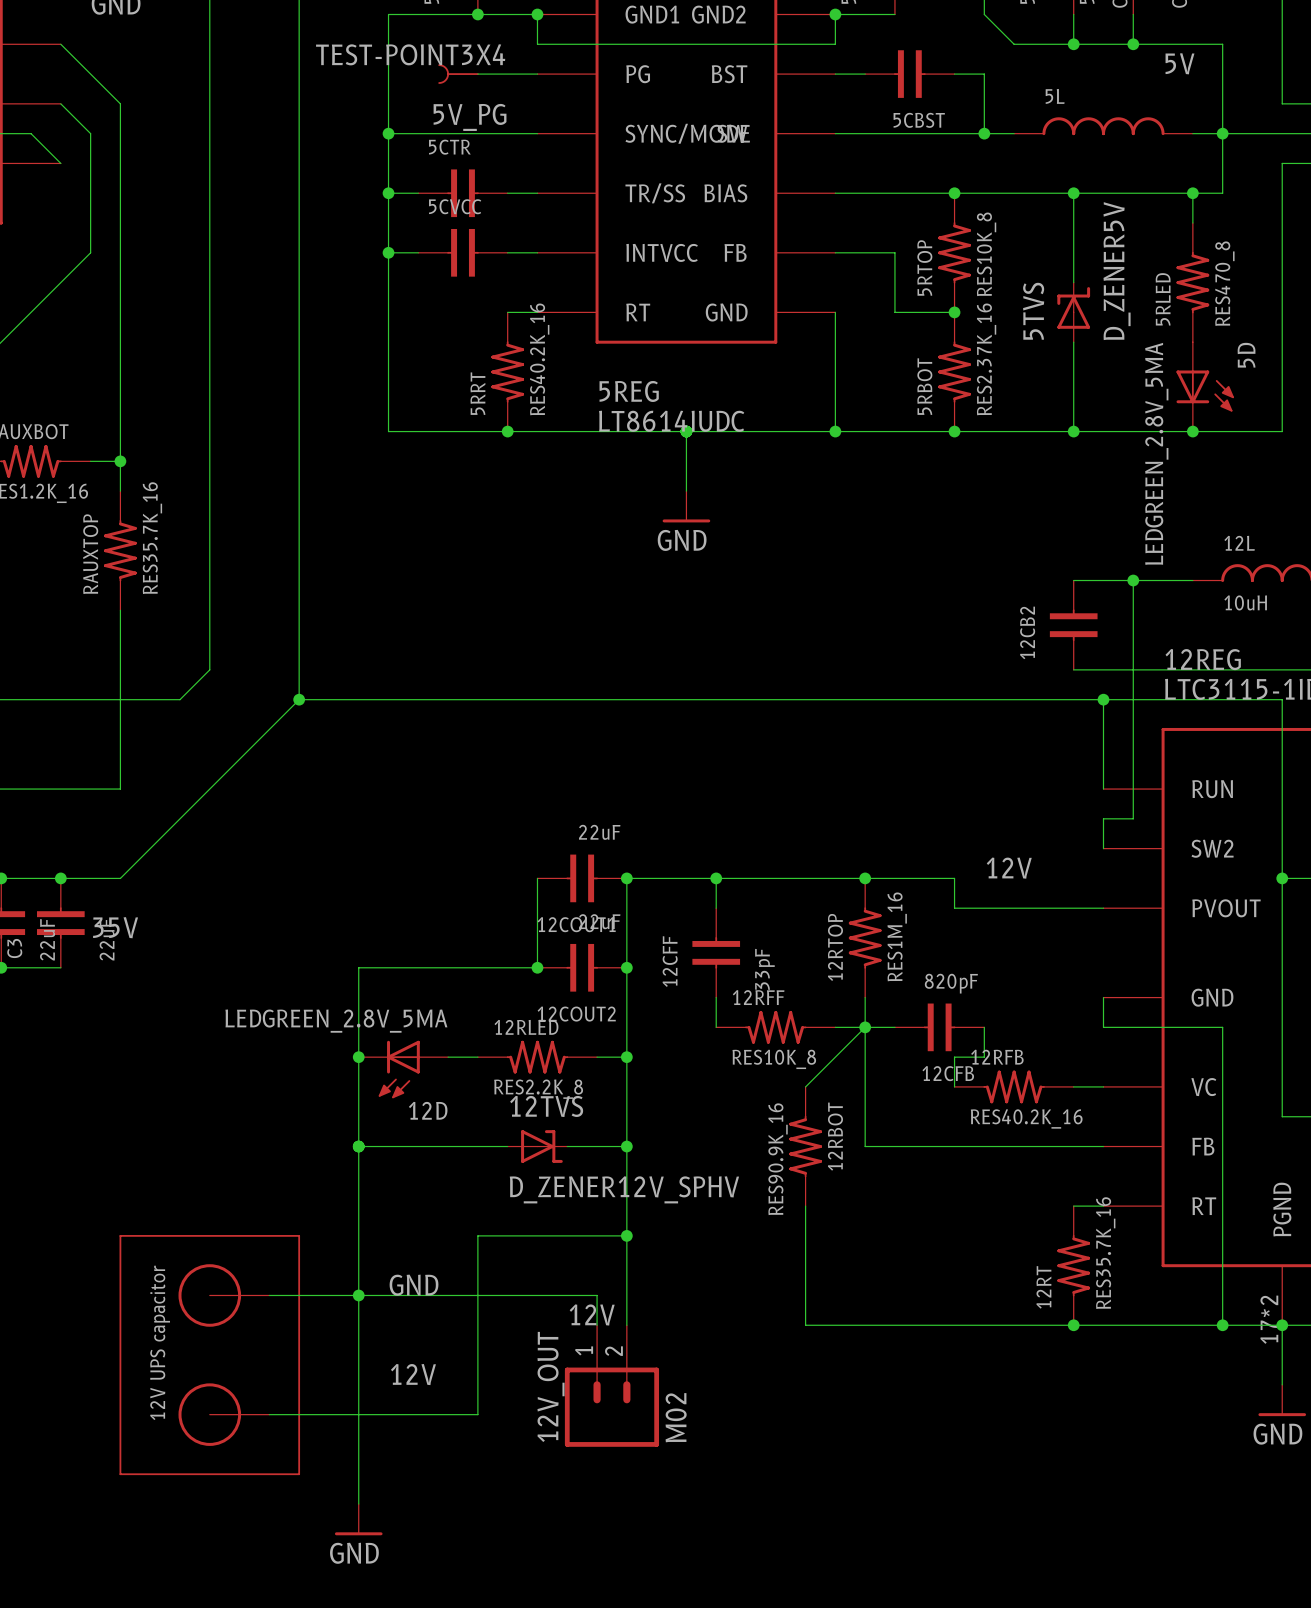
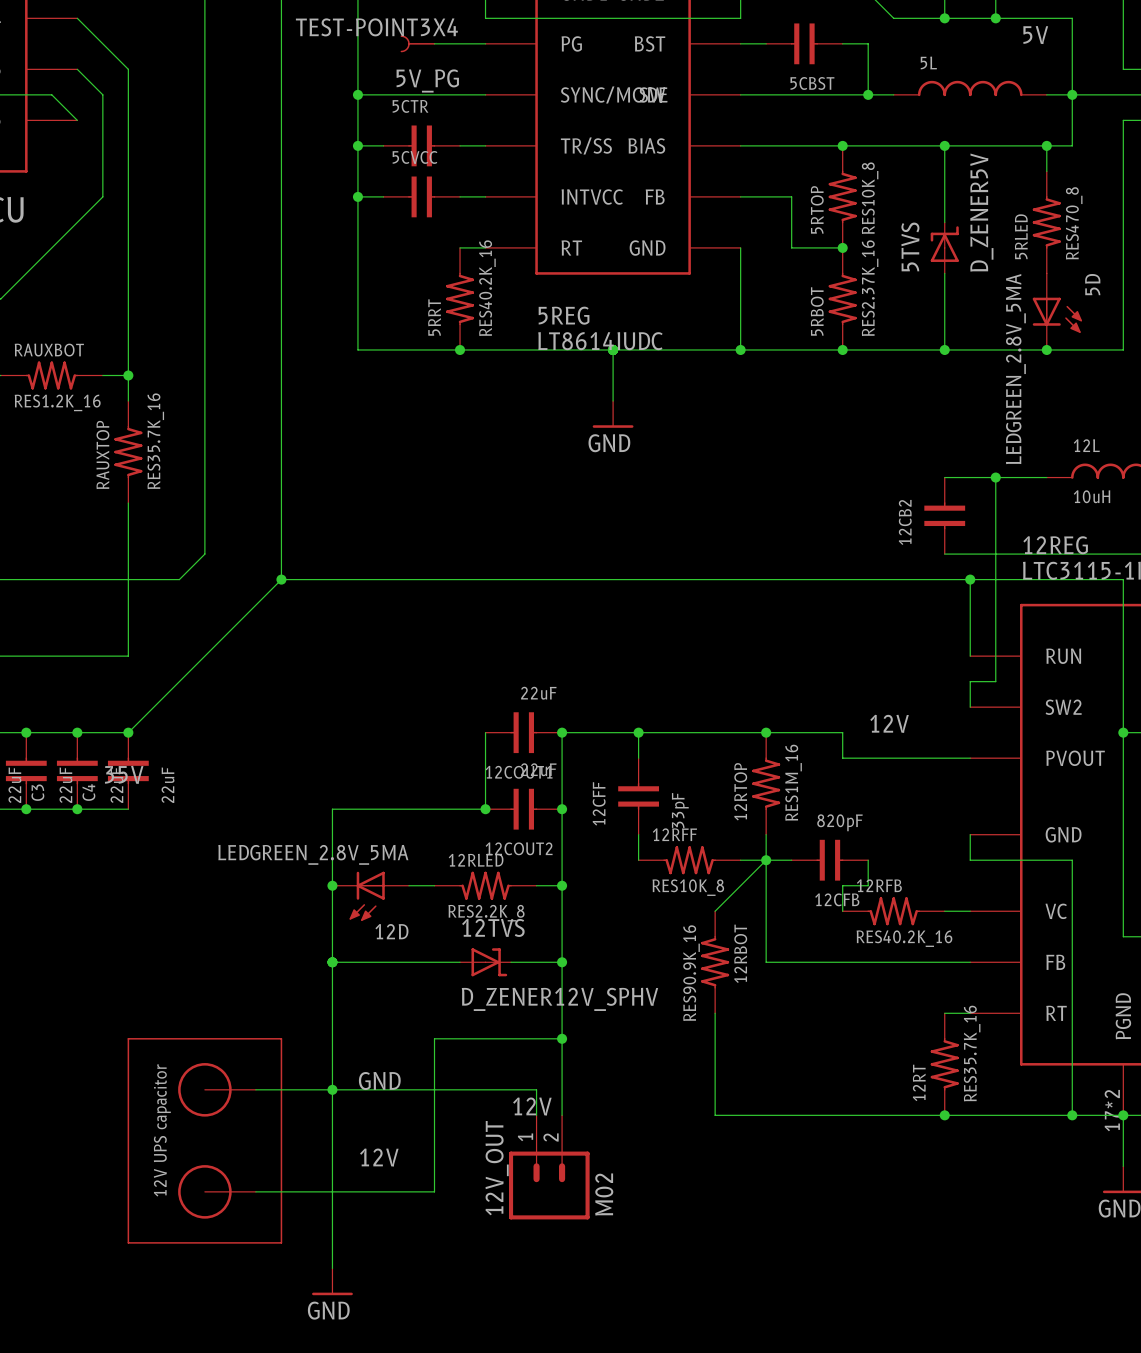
junction: none -> (128, 732)
C4: none -> 22uF (128, 770)
wire: none -> (77, 809) (128, 809)
junction: none -> (77, 809)

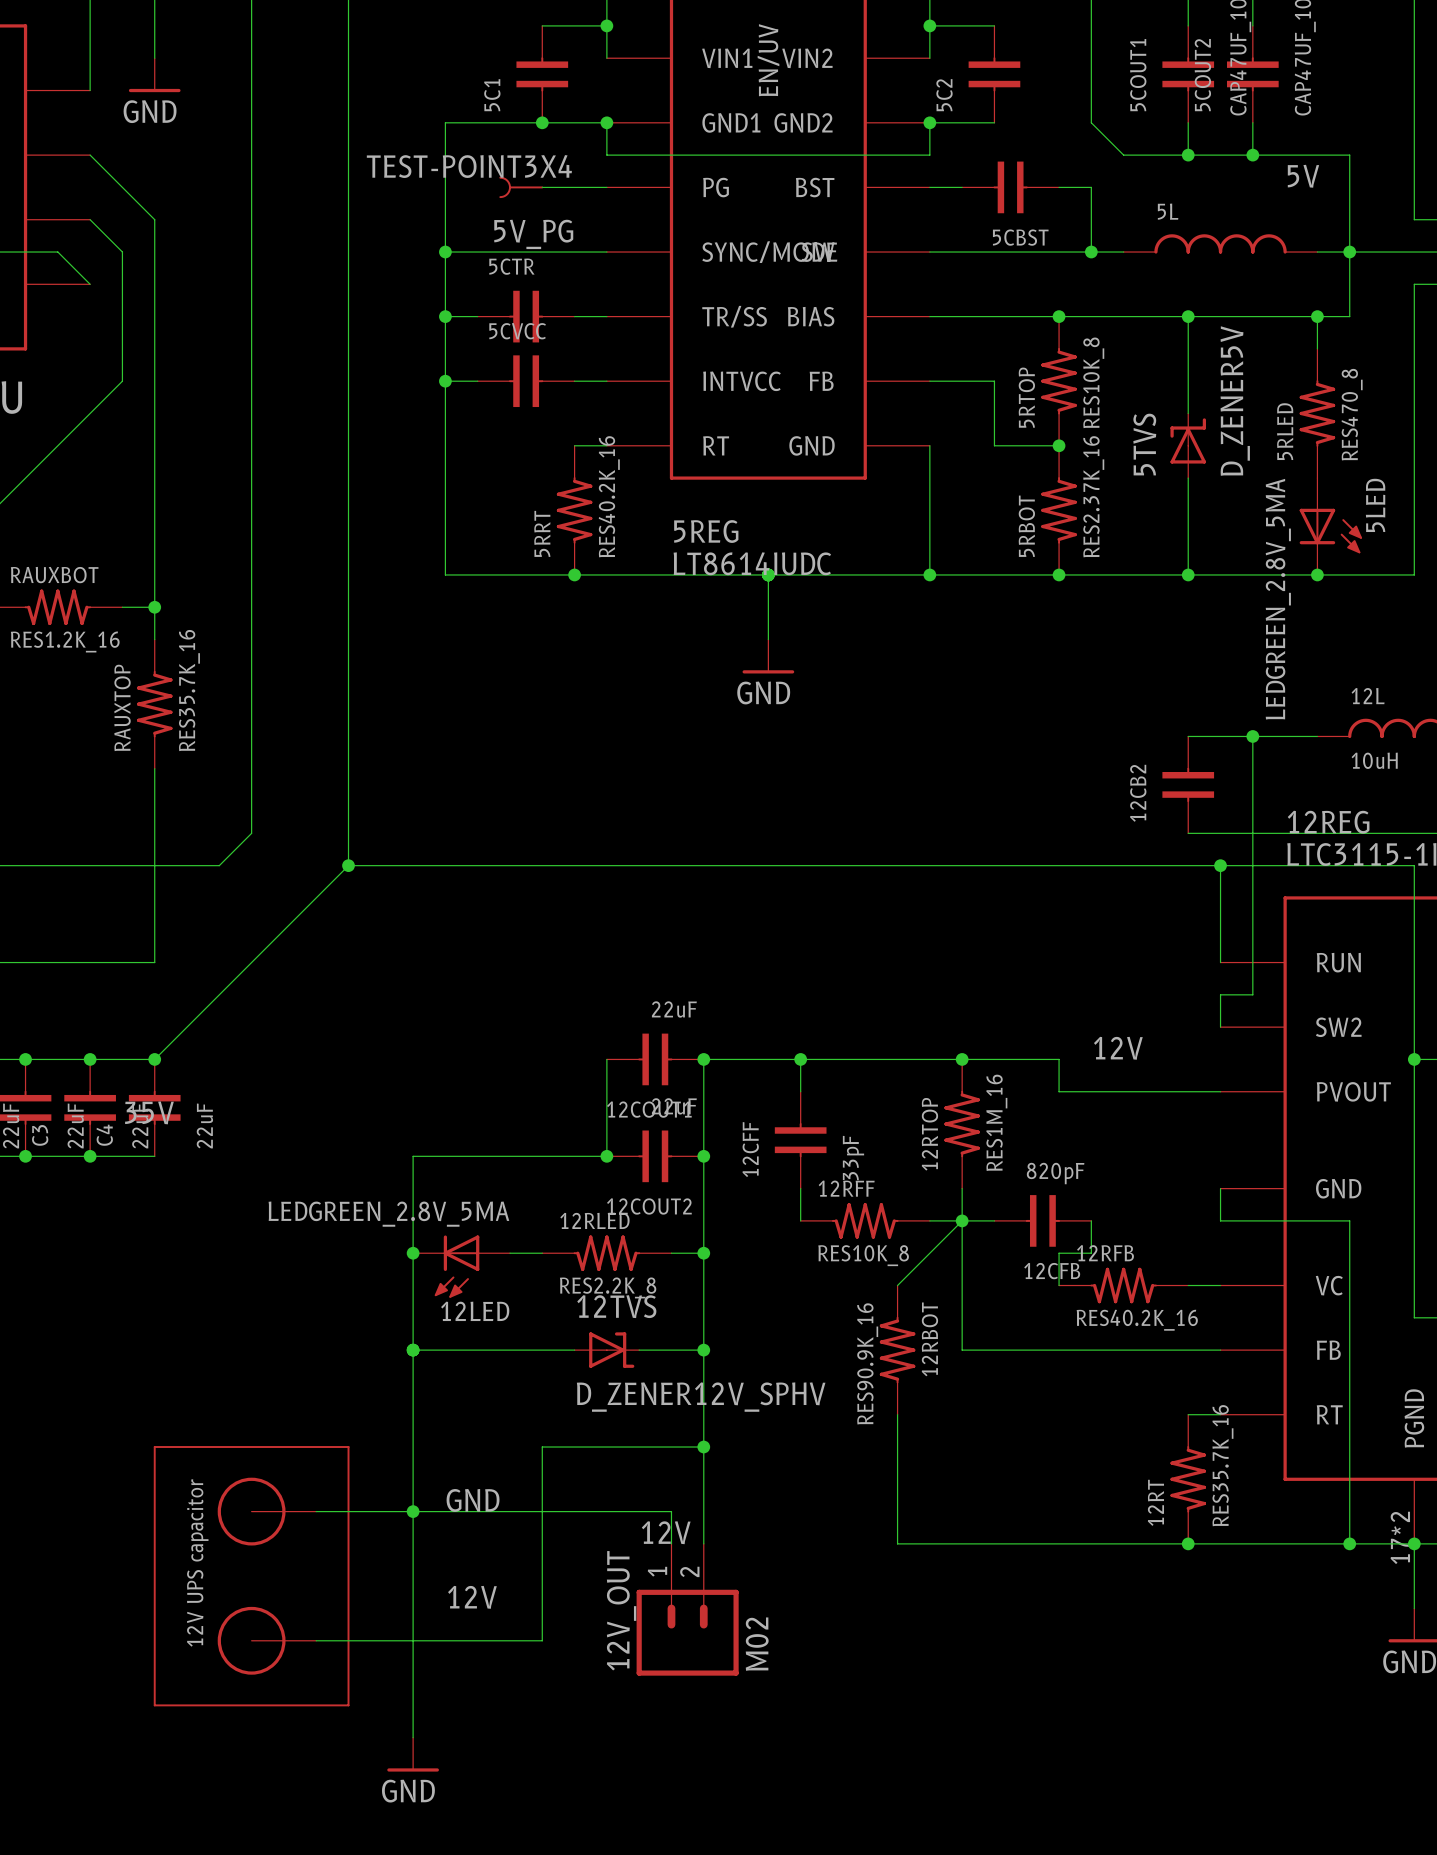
5D name: 5D (1092, 284) -> 5LED (1375, 505)
12D name: 12D (391, 931) -> 12LED (475, 1311)

